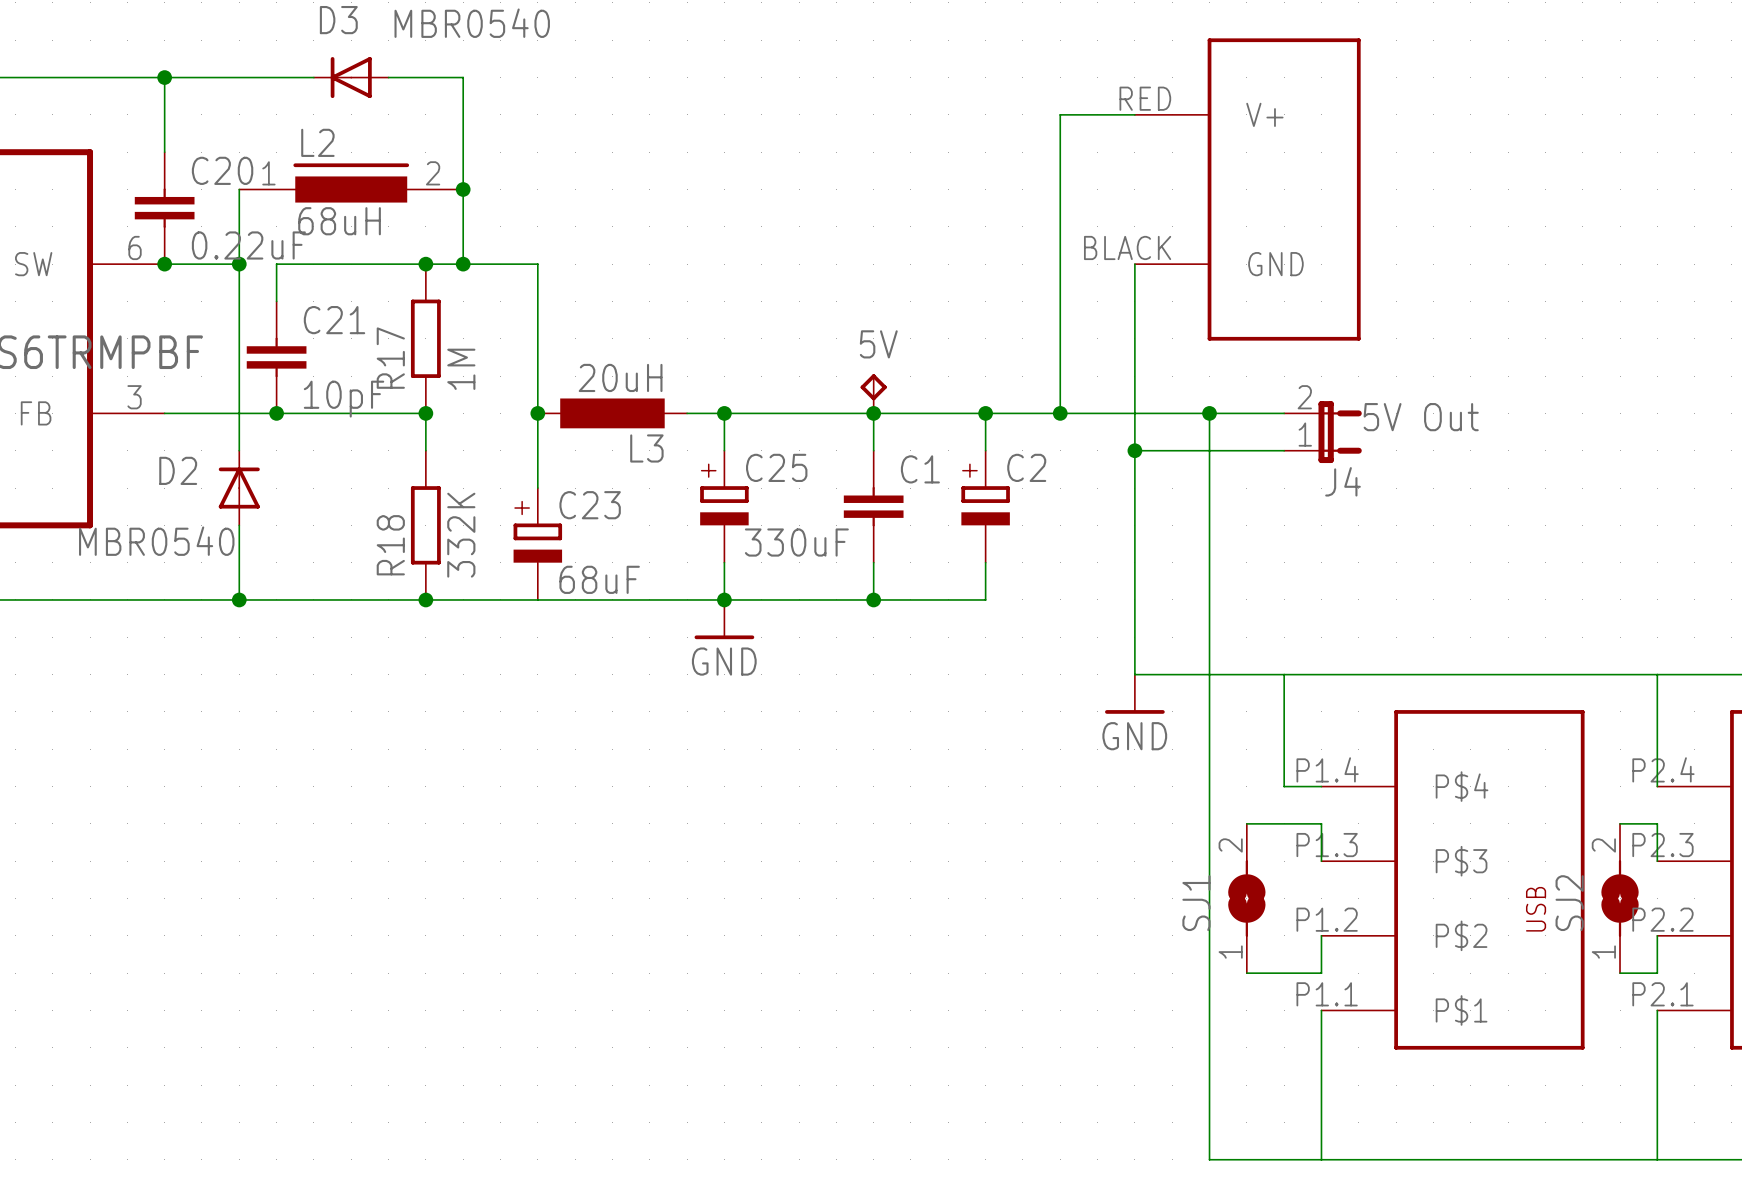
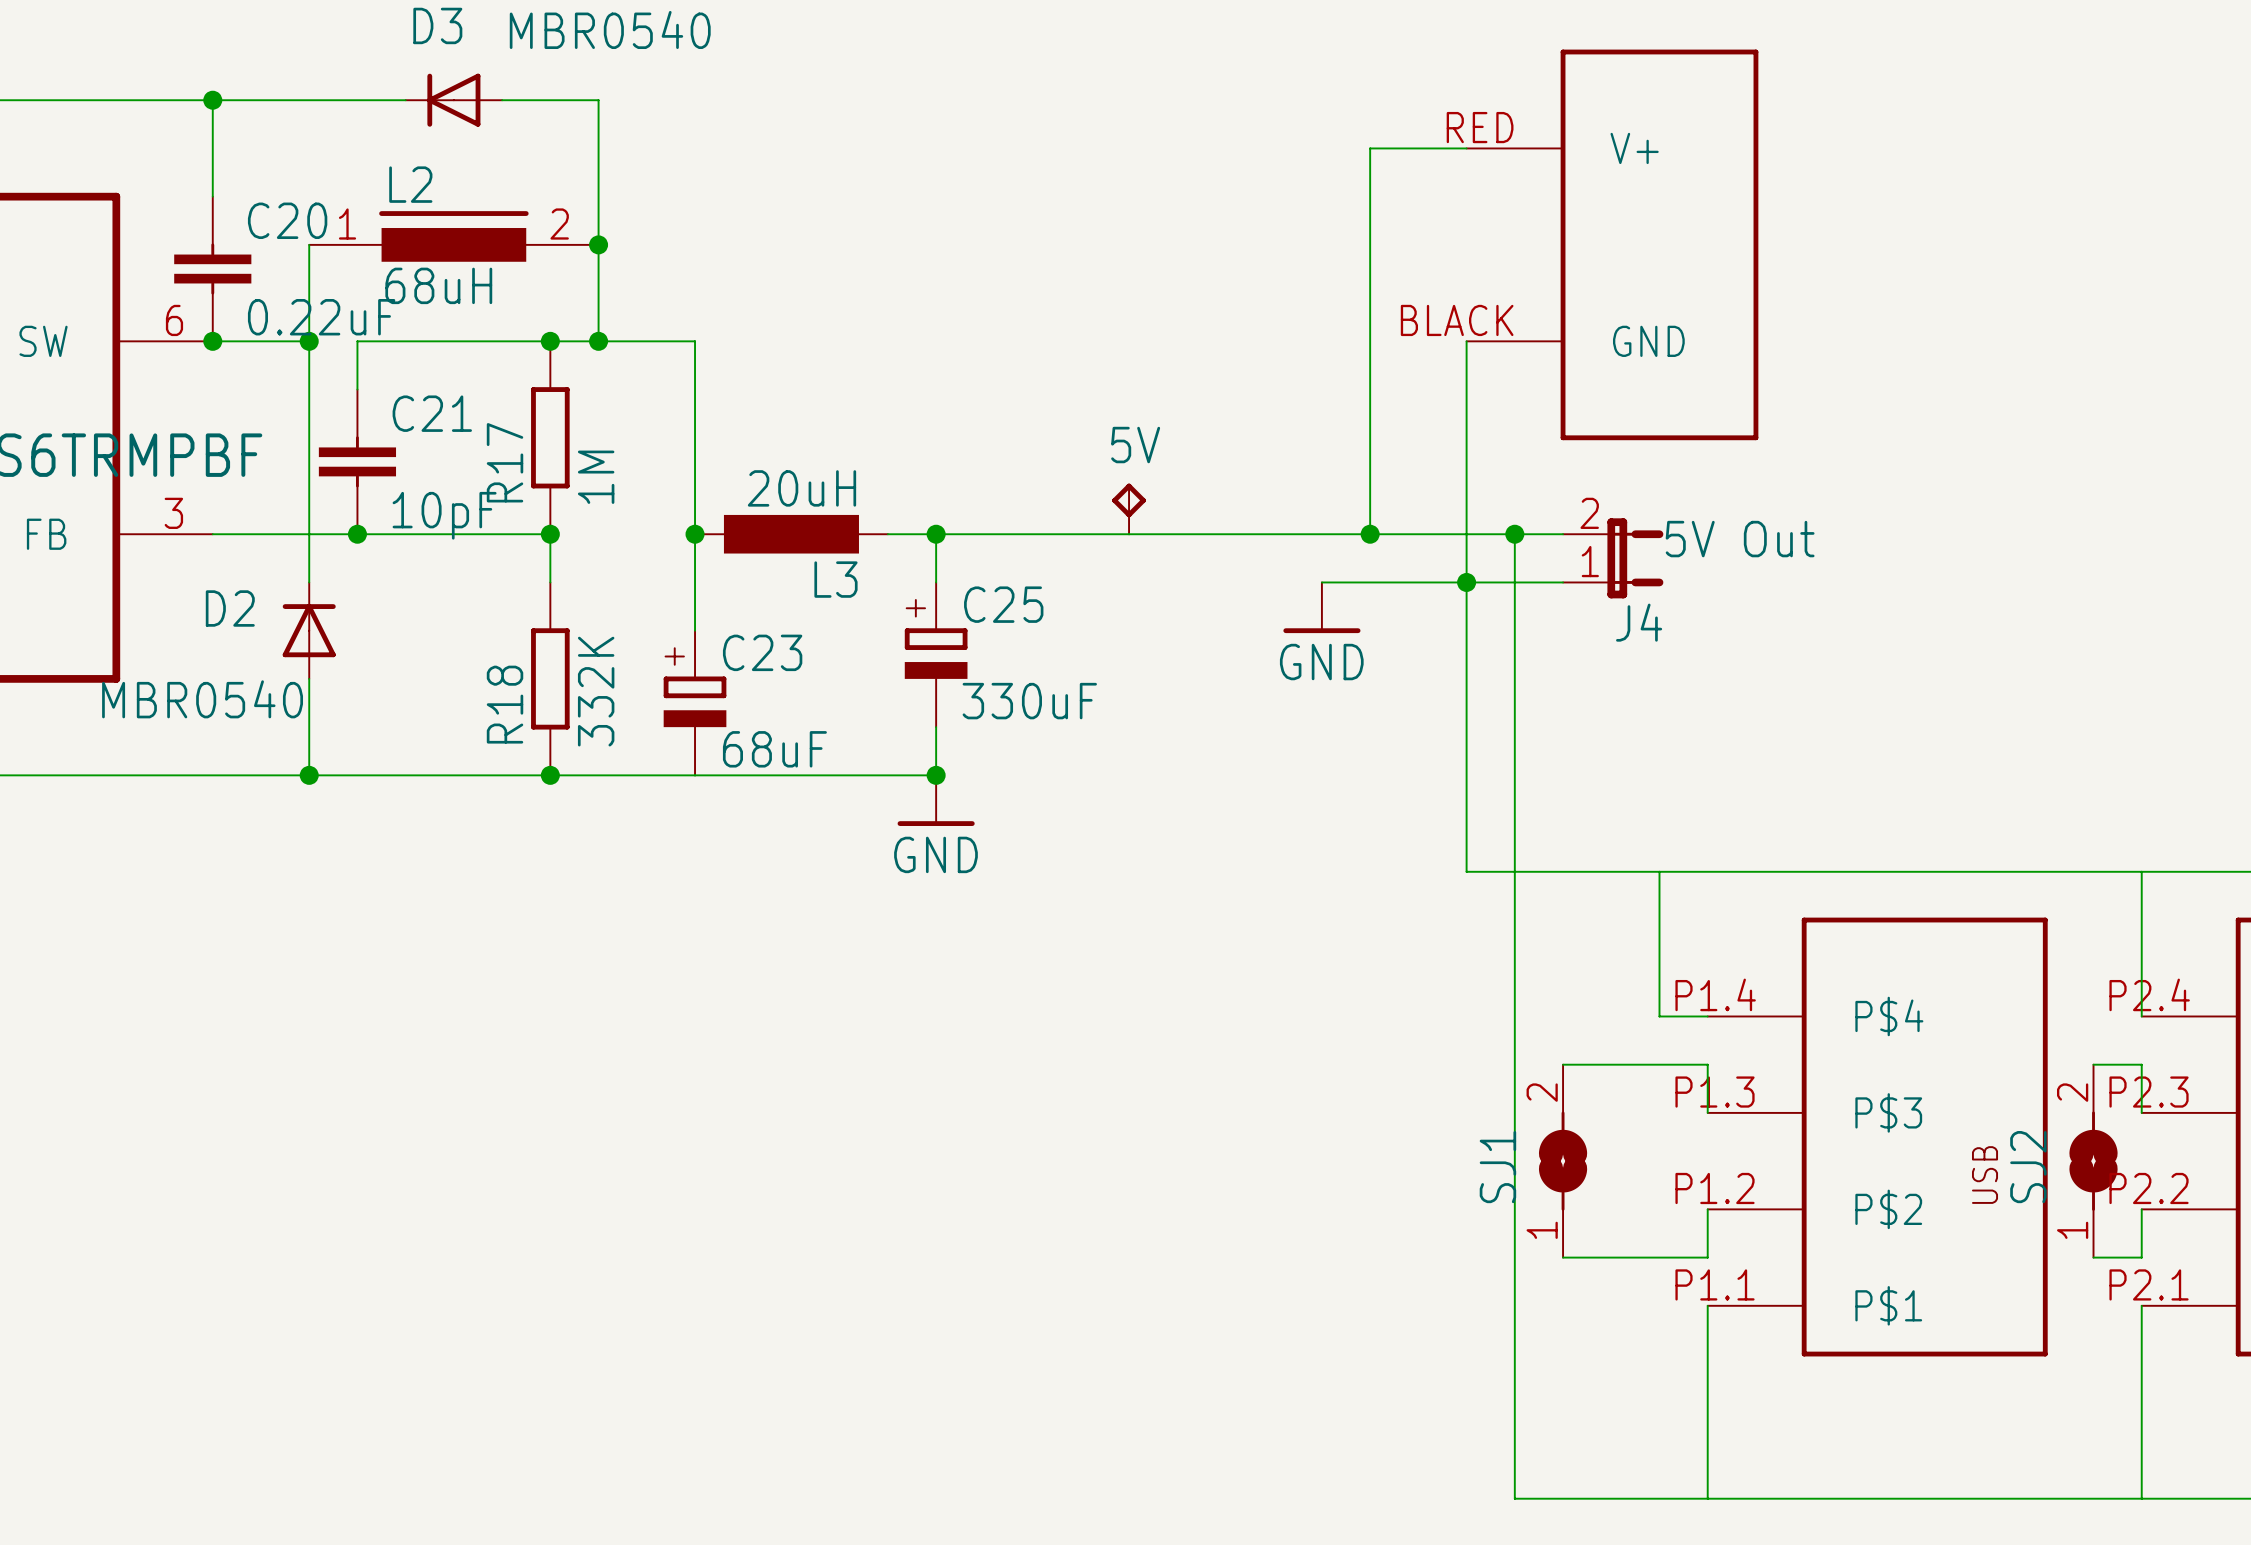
wire: (873, 413) (873, 450) -> none
junction: (873, 413) -> none
wire: (985, 413) (985, 450) -> none
junction: (985, 413) -> none
junction position: (1209, 413) -> (1514, 534)
wire: (1284, 413) (1209, 413) (1209, 1159) -> (1514, 534) (1514, 1498) (1563, 1498)
J4 position: (1322, 432) -> (1613, 558)
wire: none -> (1321, 582) (1466, 582)
C1: (873, 506) -> none
C2: (985, 506) -> none
wire: (873, 562) (873, 599) -> none
wire: (985, 562) (985, 599) (724, 599) -> none
junction: (873, 599) -> none
power symbol position: GND (1134, 694) -> GND (1321, 607)
wire: none -> (1563, 1064) (1611, 1064)
SJ1 position: (1246, 898) -> (1563, 1161)
wire: none -> (1563, 1257) (1611, 1257)

